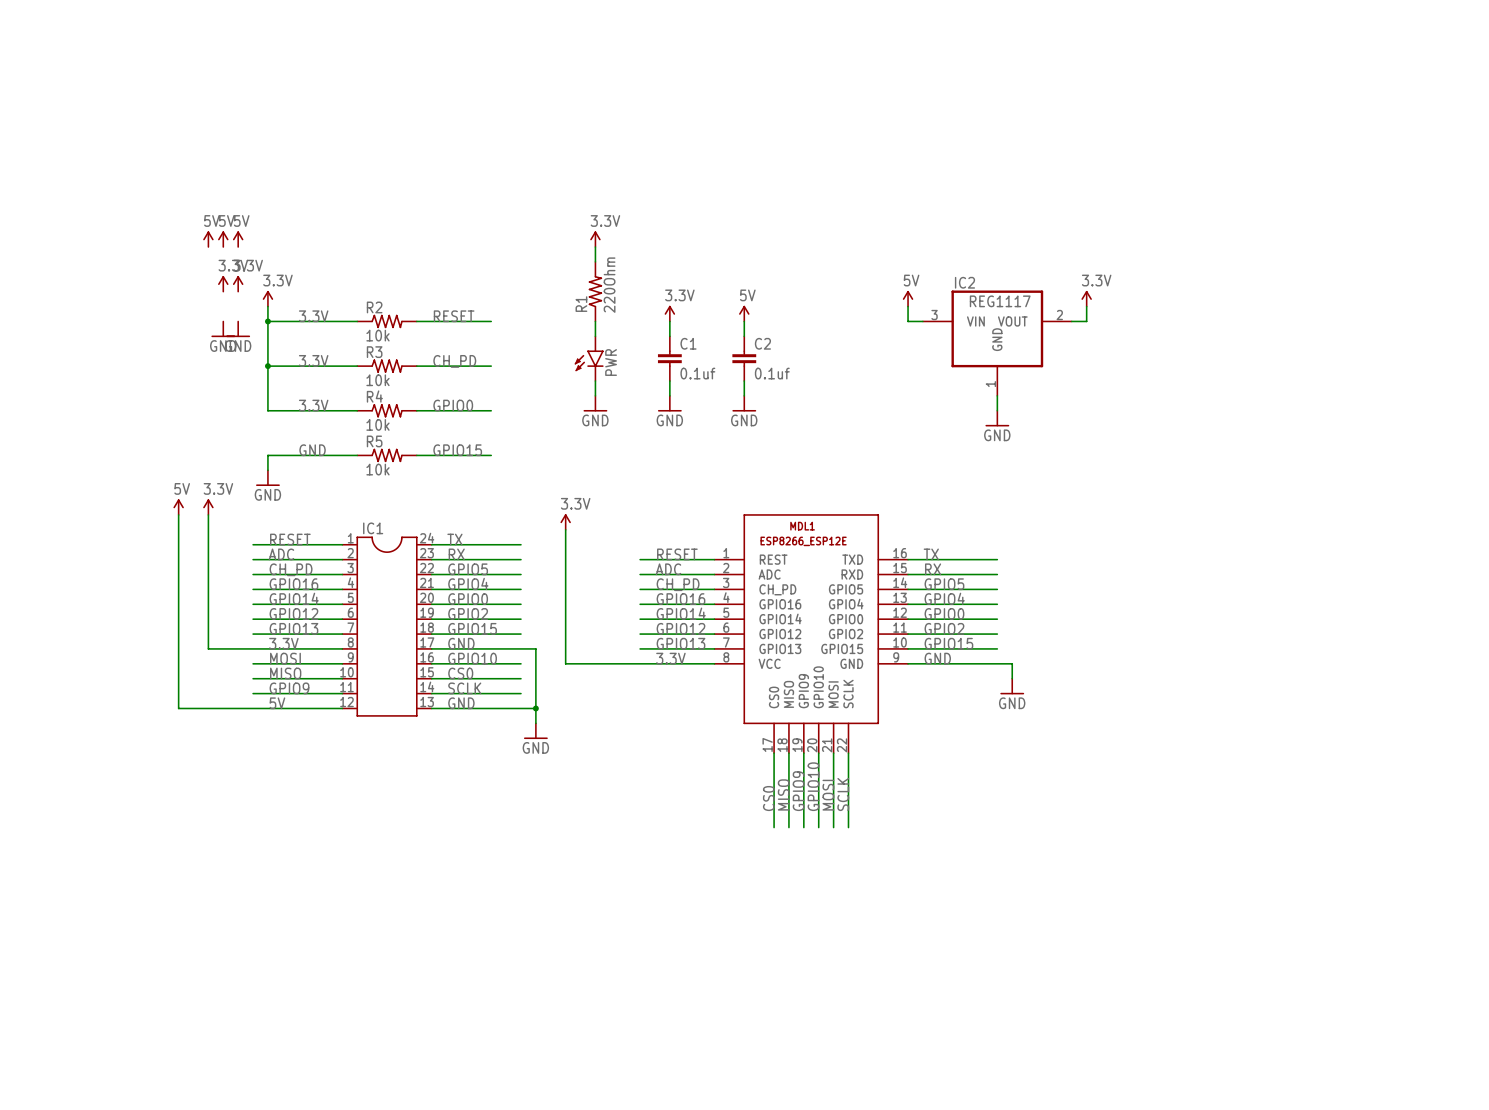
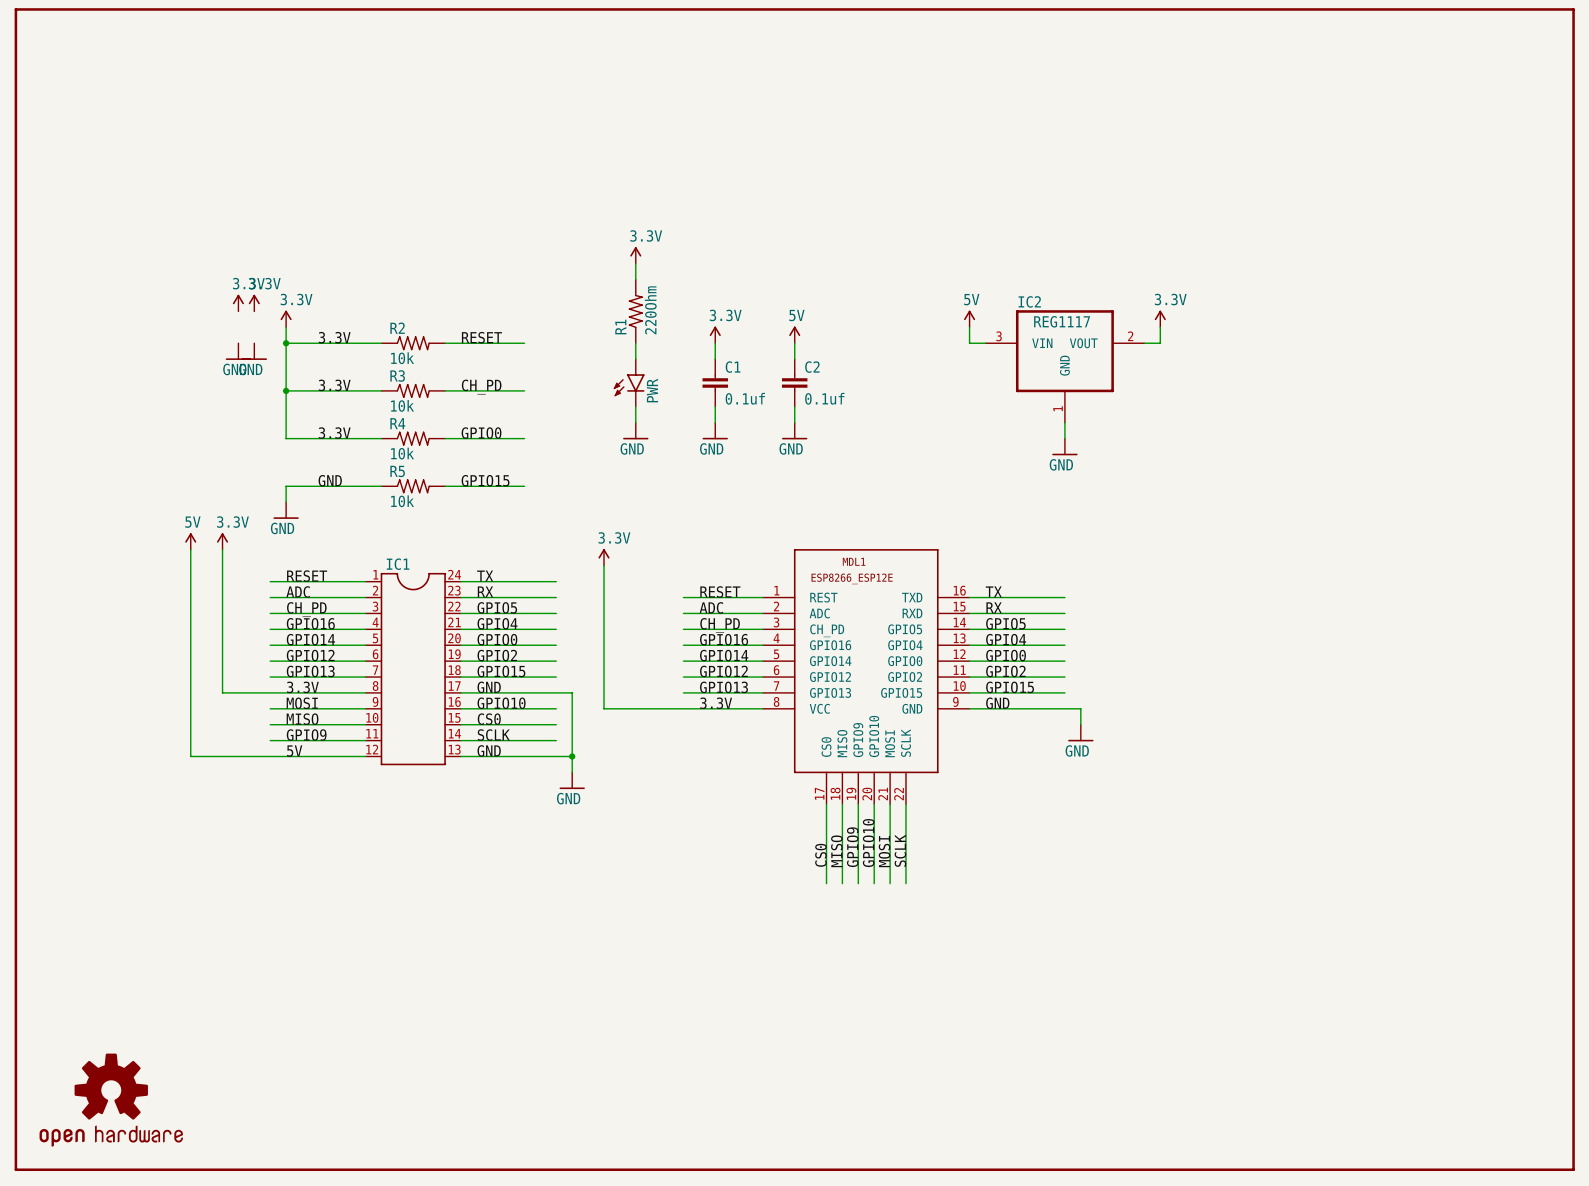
power symbol: 5V (208, 239) -> none
power symbol: 5V (223, 239) -> none
power symbol: 5V (238, 239) -> none
part: none -> (794, 589)
part: none -> (111, 1100)

